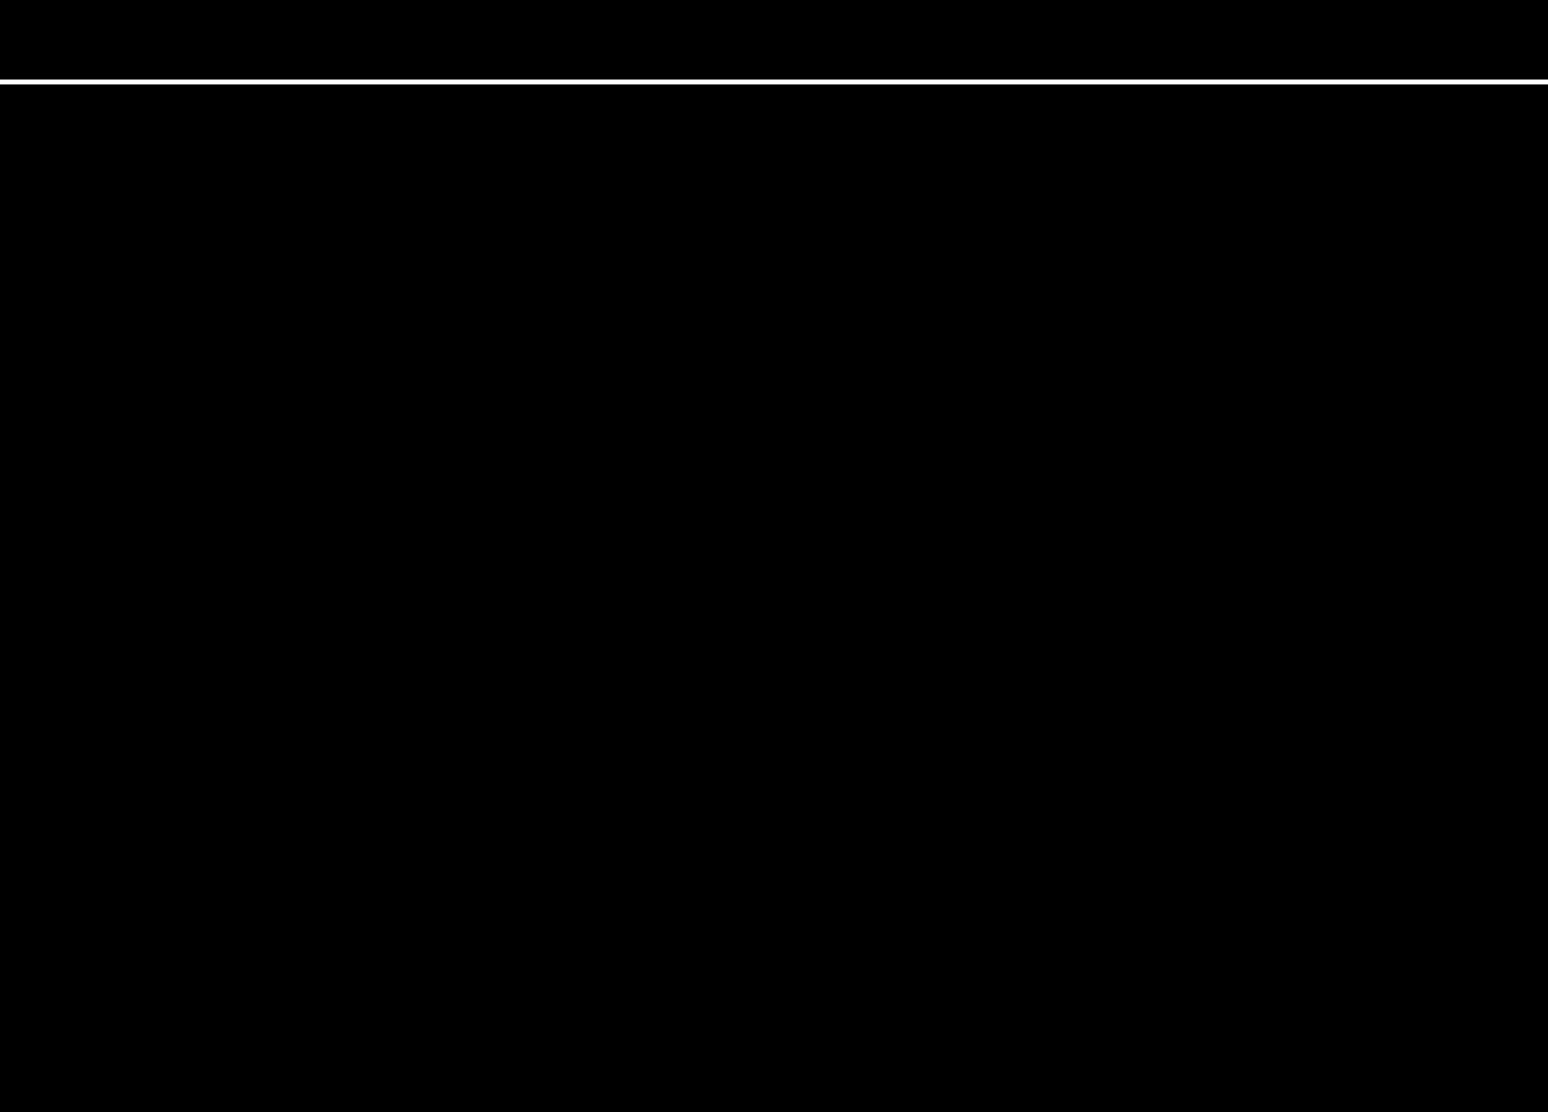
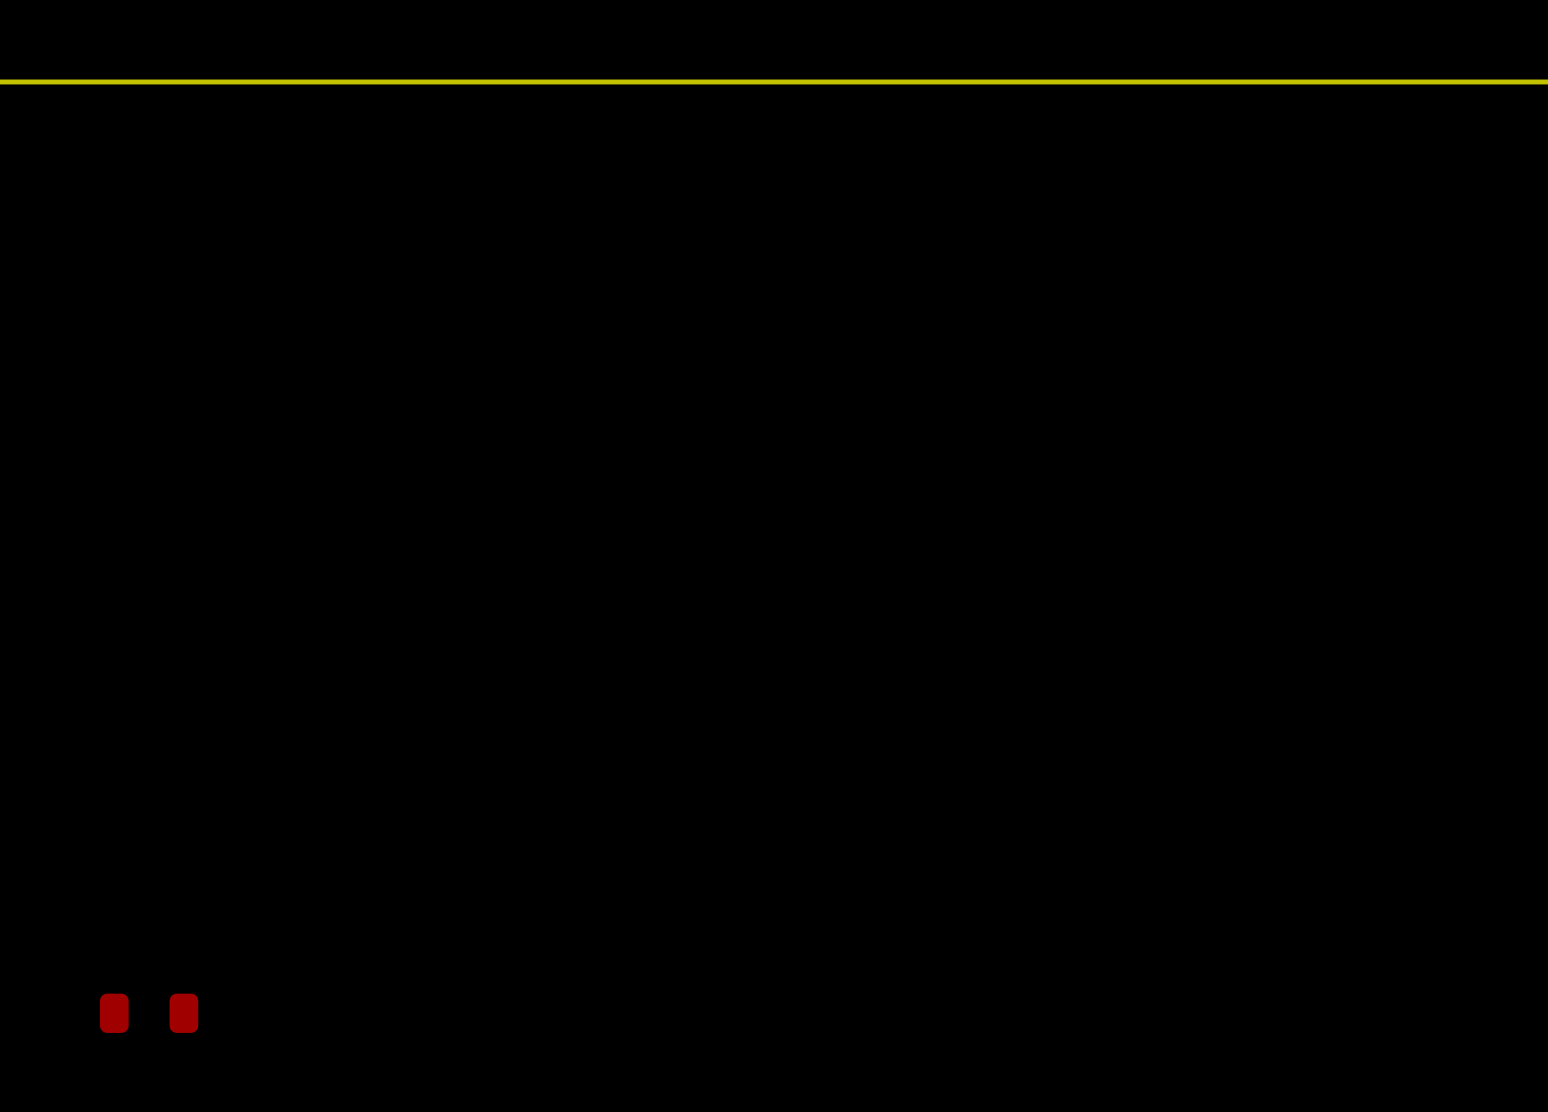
part: none -> (149, 1013)

